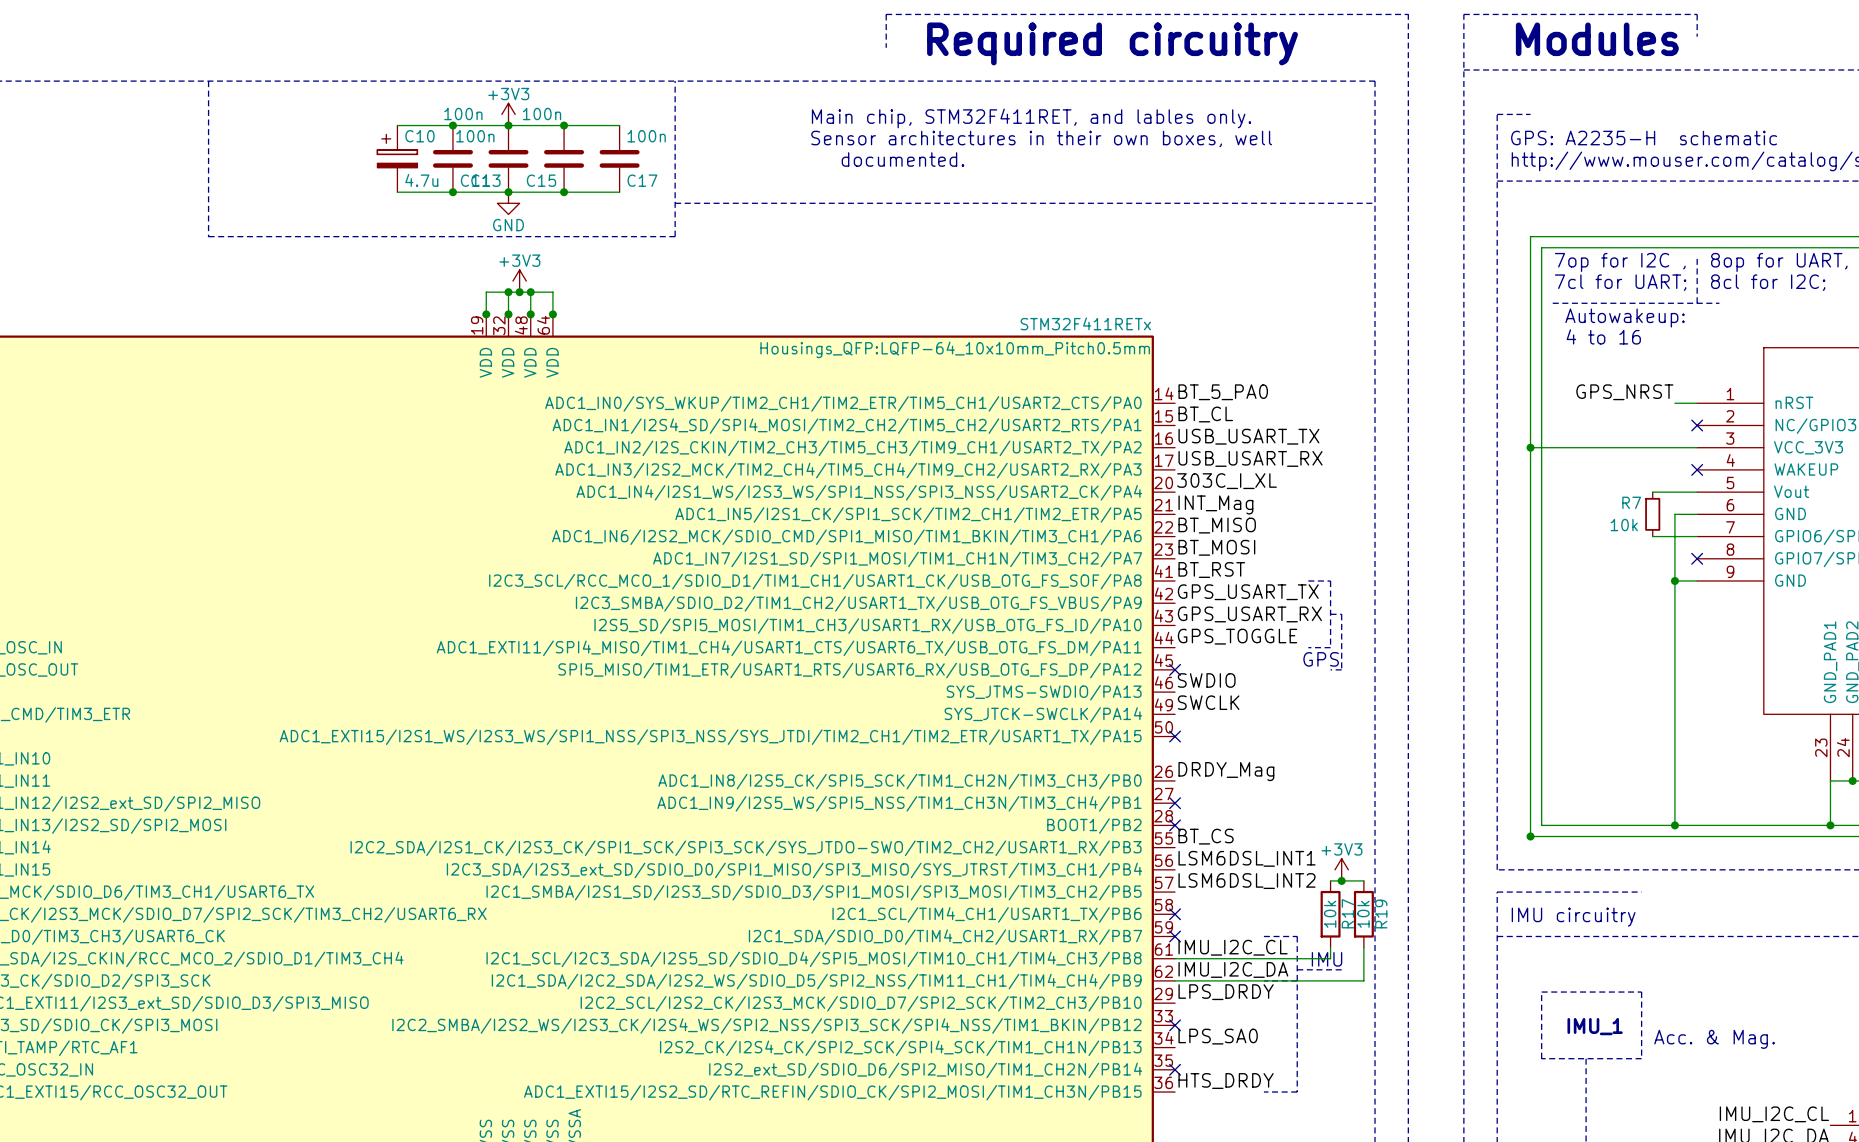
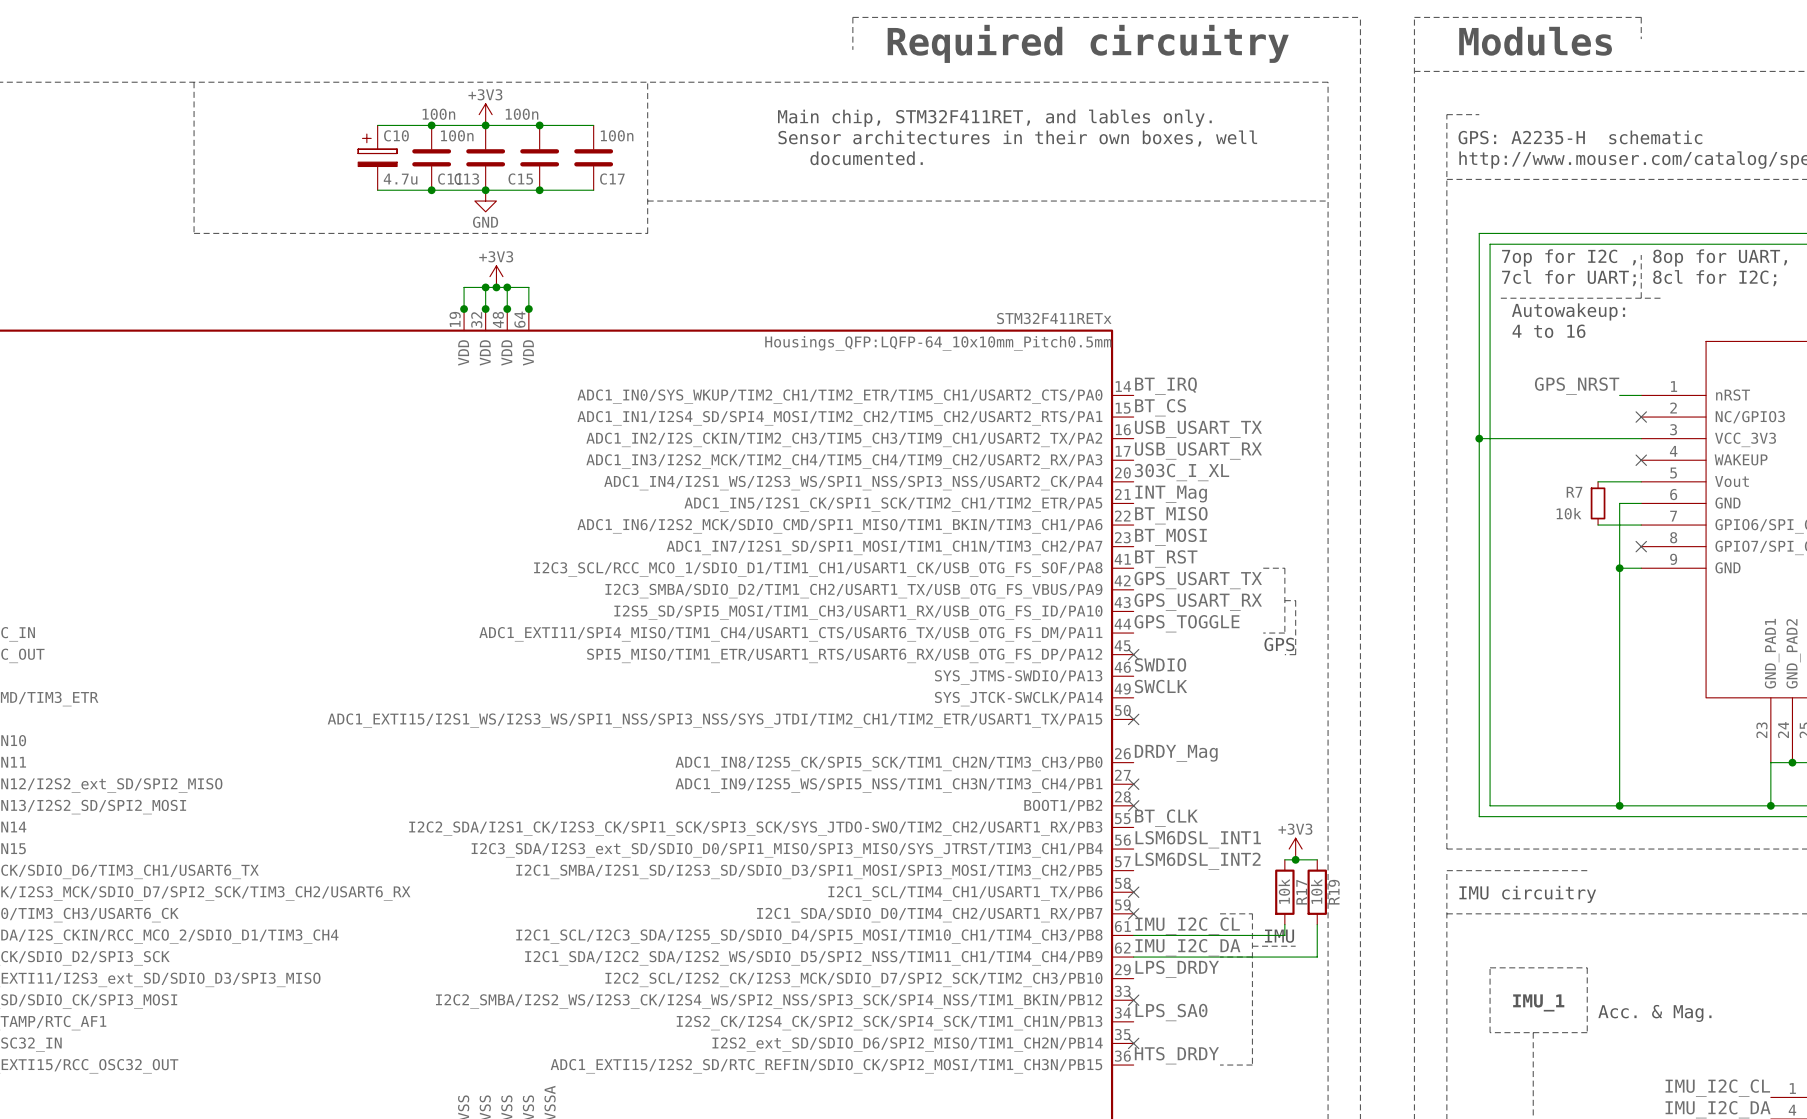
label: BT_5_PA0 (1223, 392) -> BT_IRQ (1165, 386)
label: BT_CL (1205, 414) -> BT_CS (1160, 407)
label: BT_CS (1206, 836) -> BT_CLK (1166, 818)
junction: (1530, 836) -> none

